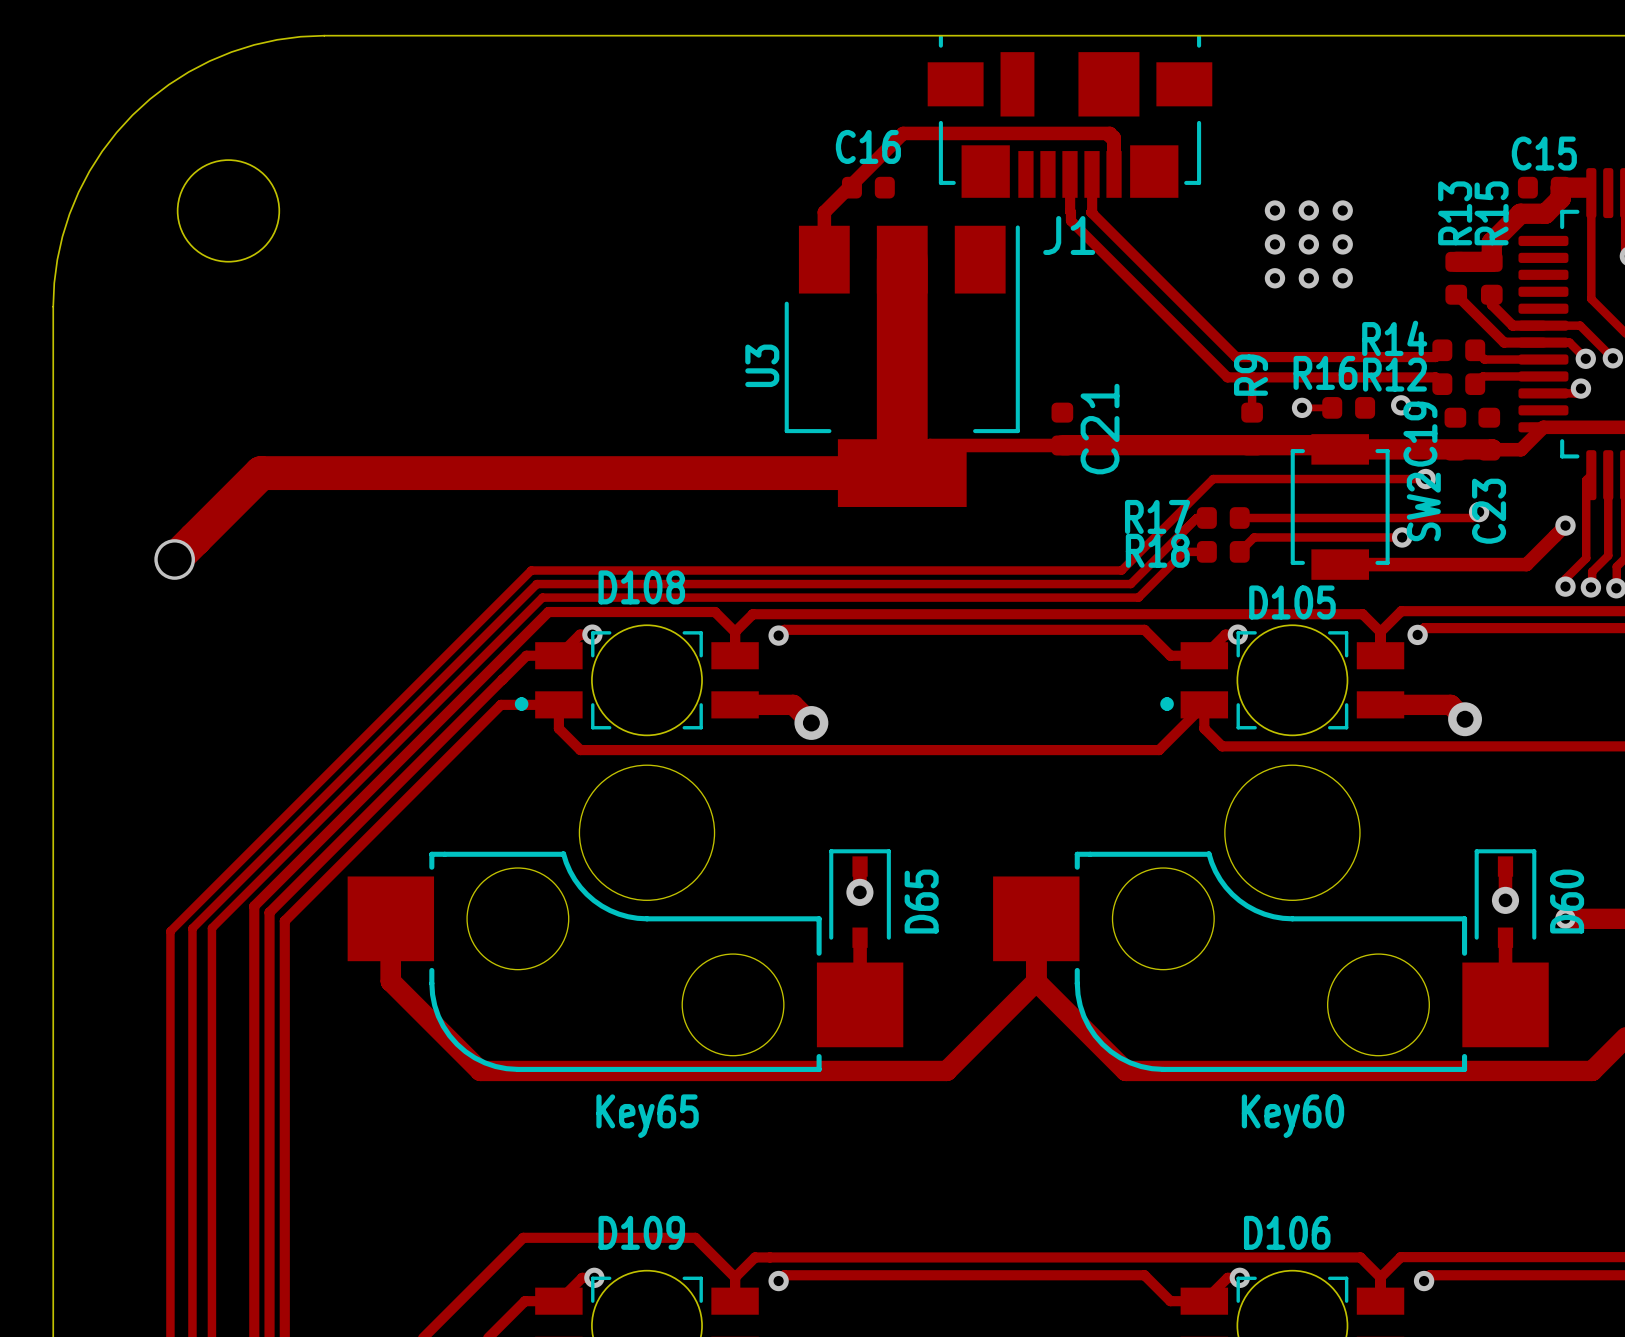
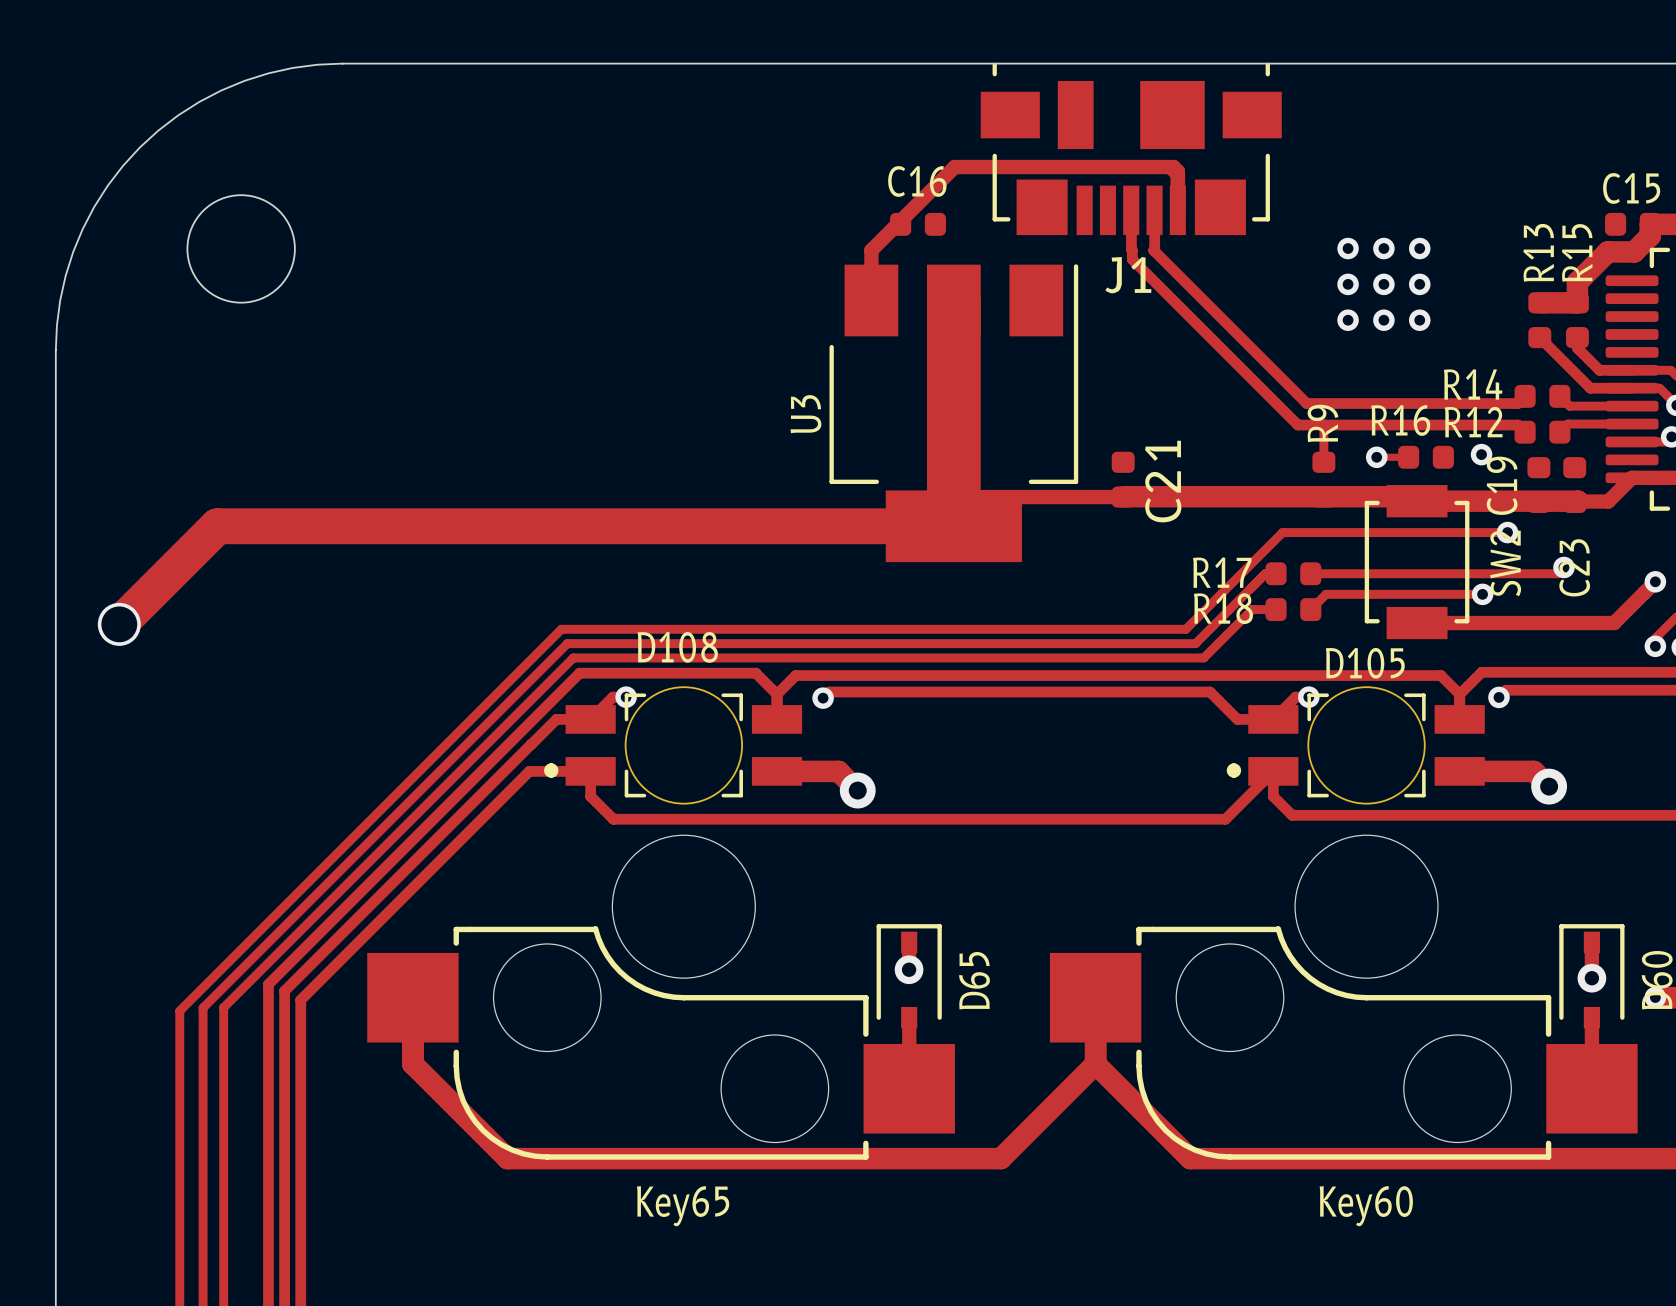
track: (261, 473) (174, 559) -> (275, 526) (217, 526) (119, 624)
via position: (174, 559) -> (119, 624)

